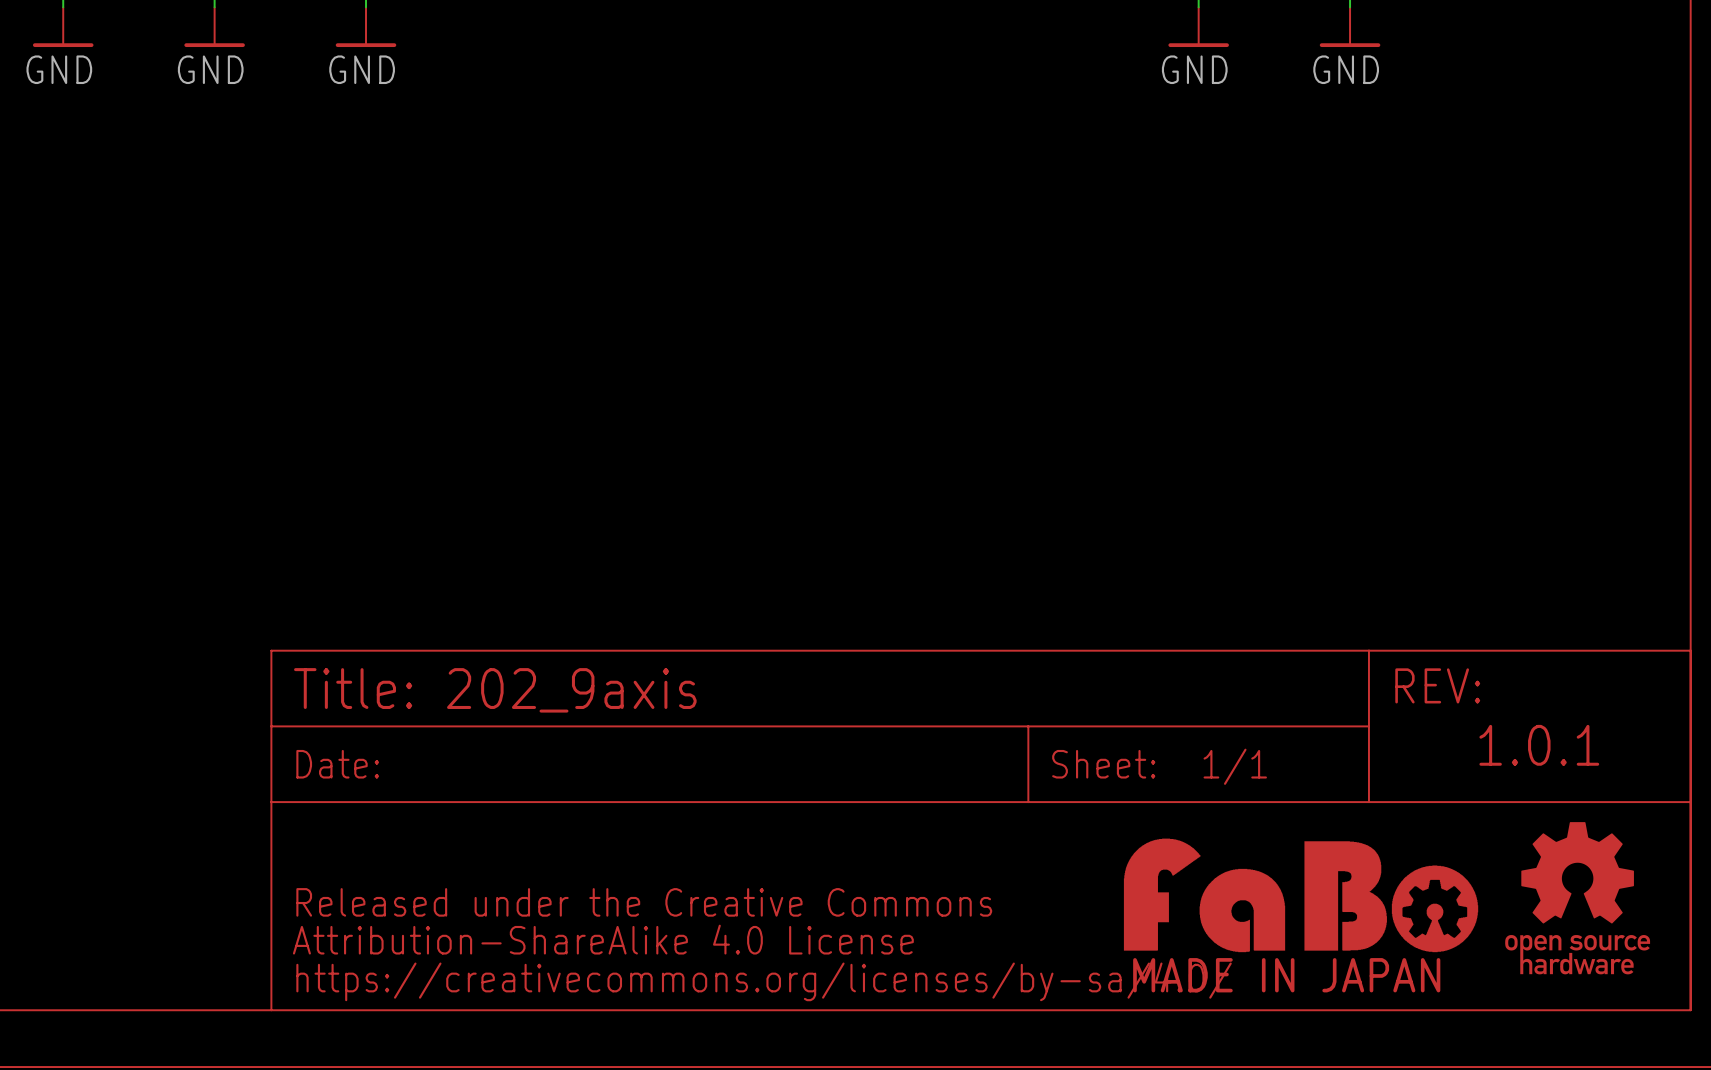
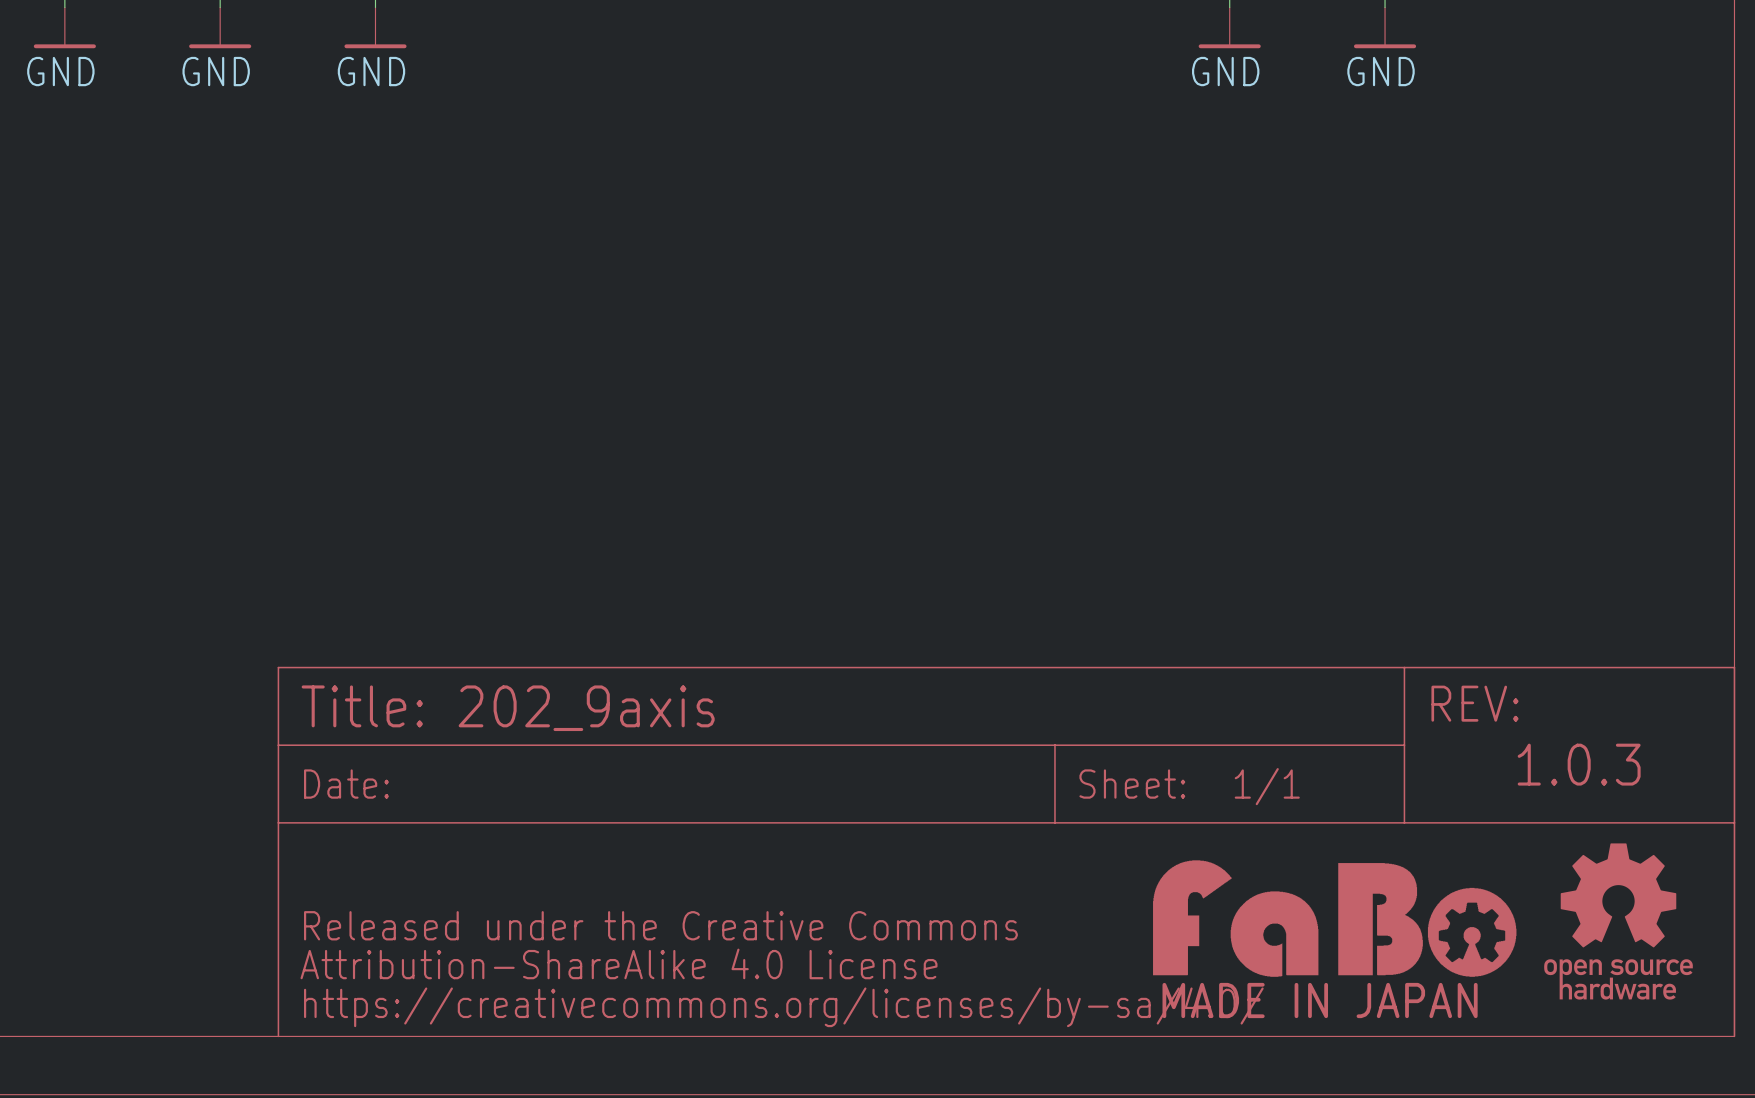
text: 1.0.1 (1539, 745) -> 1.0.3 (1579, 764)

